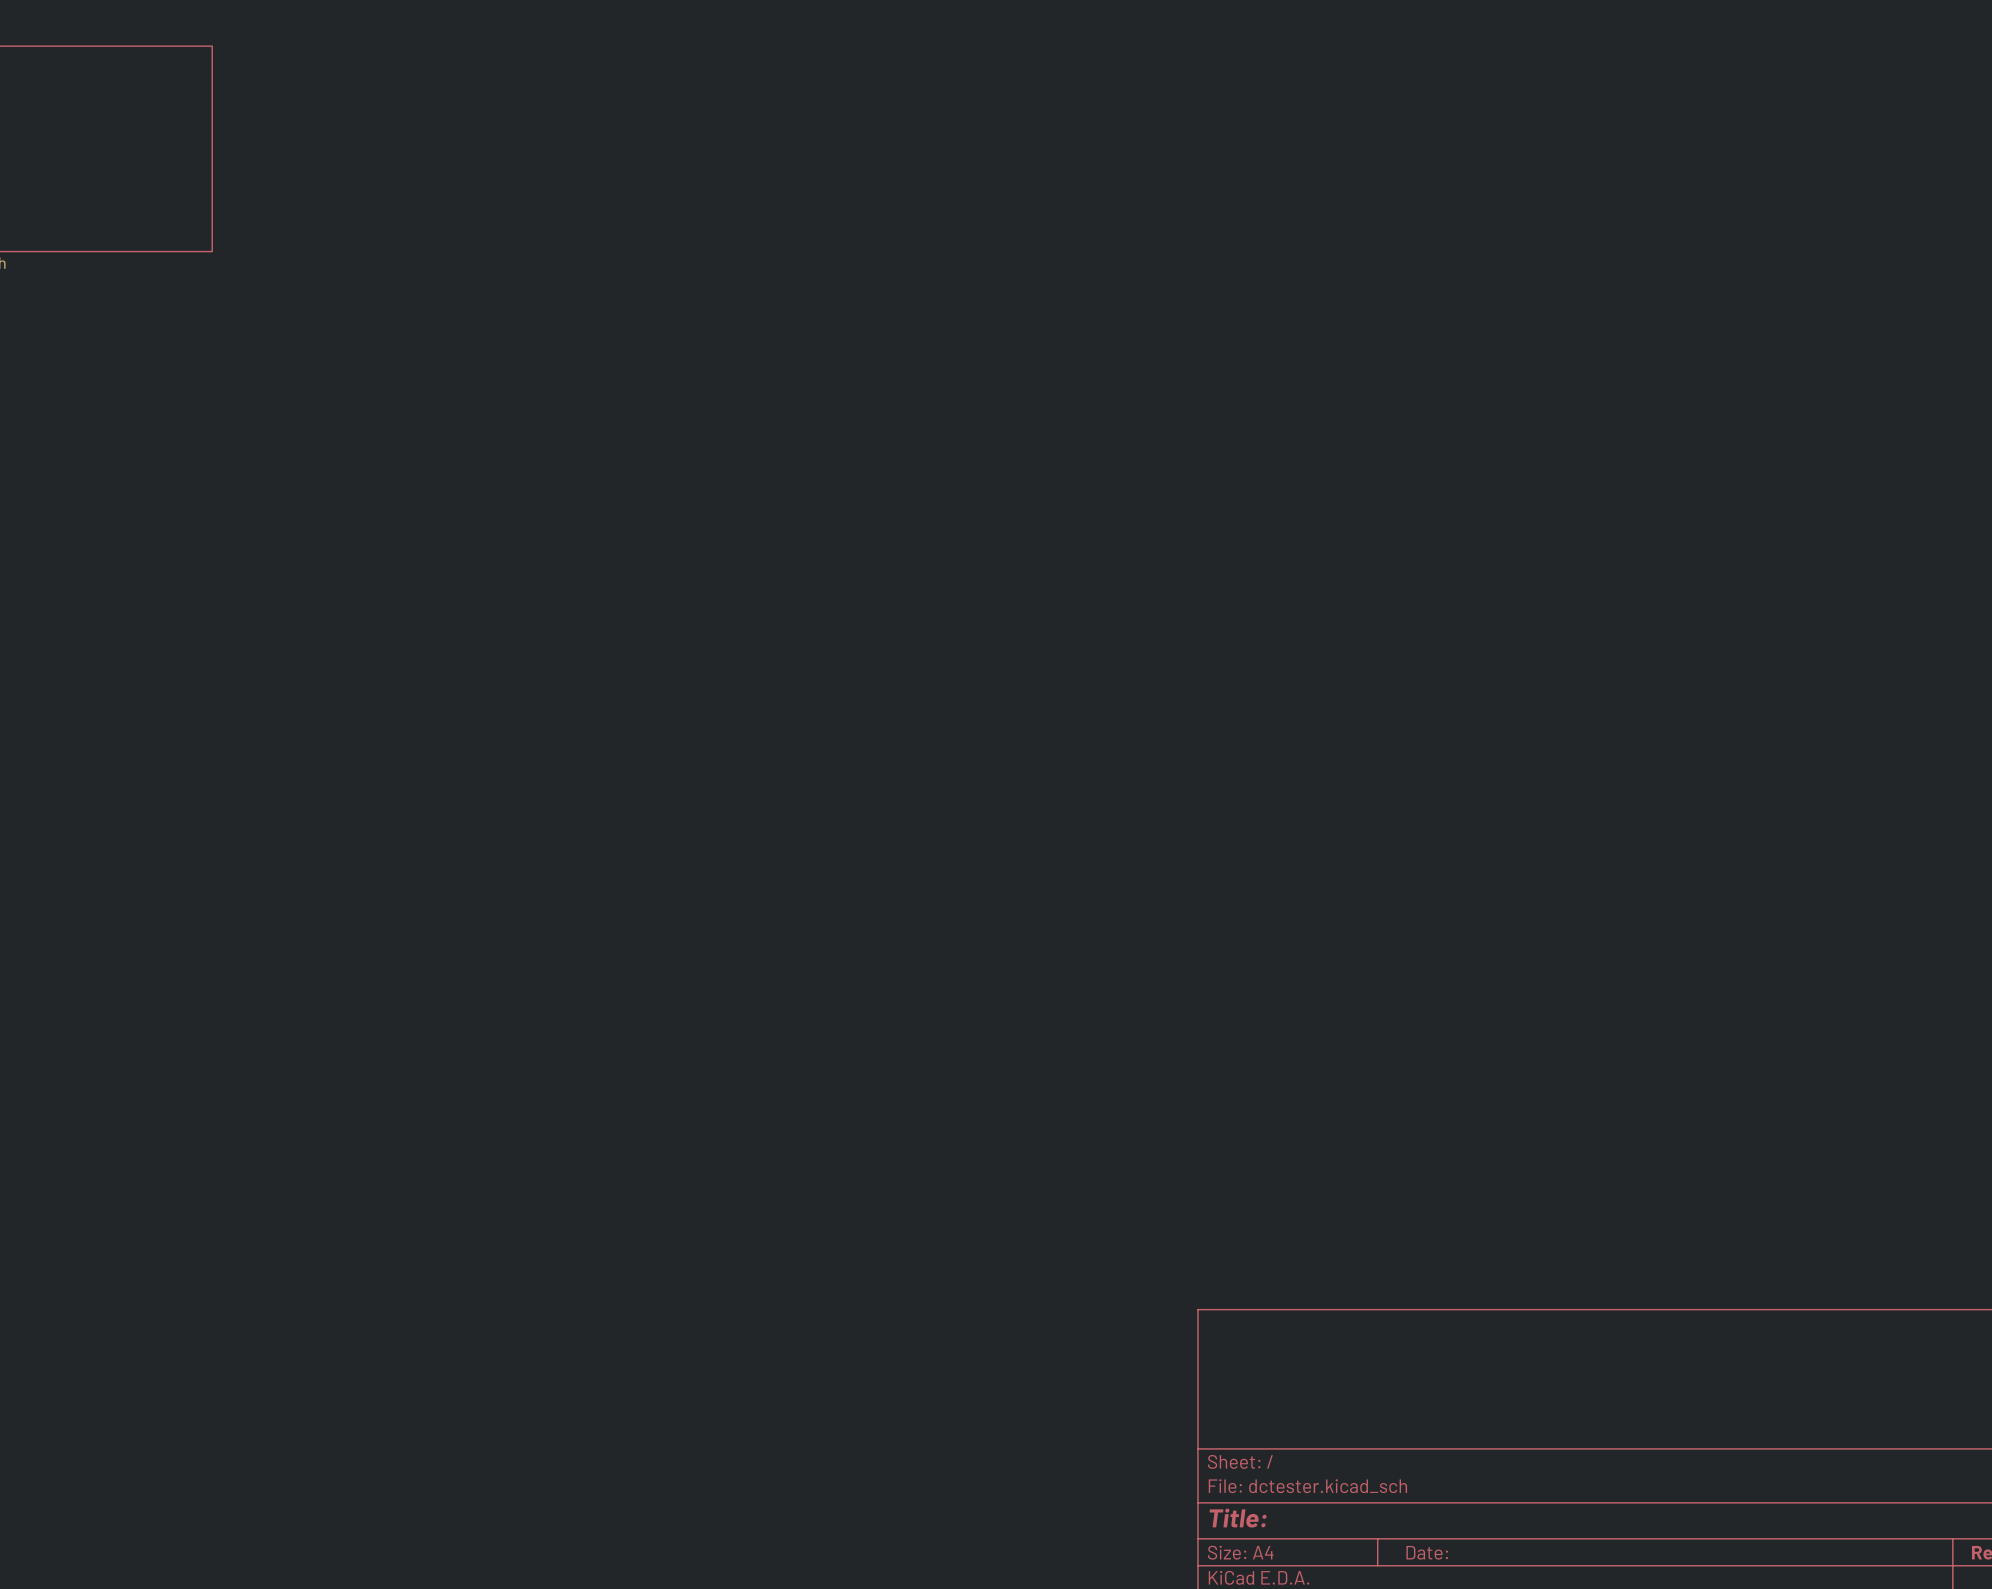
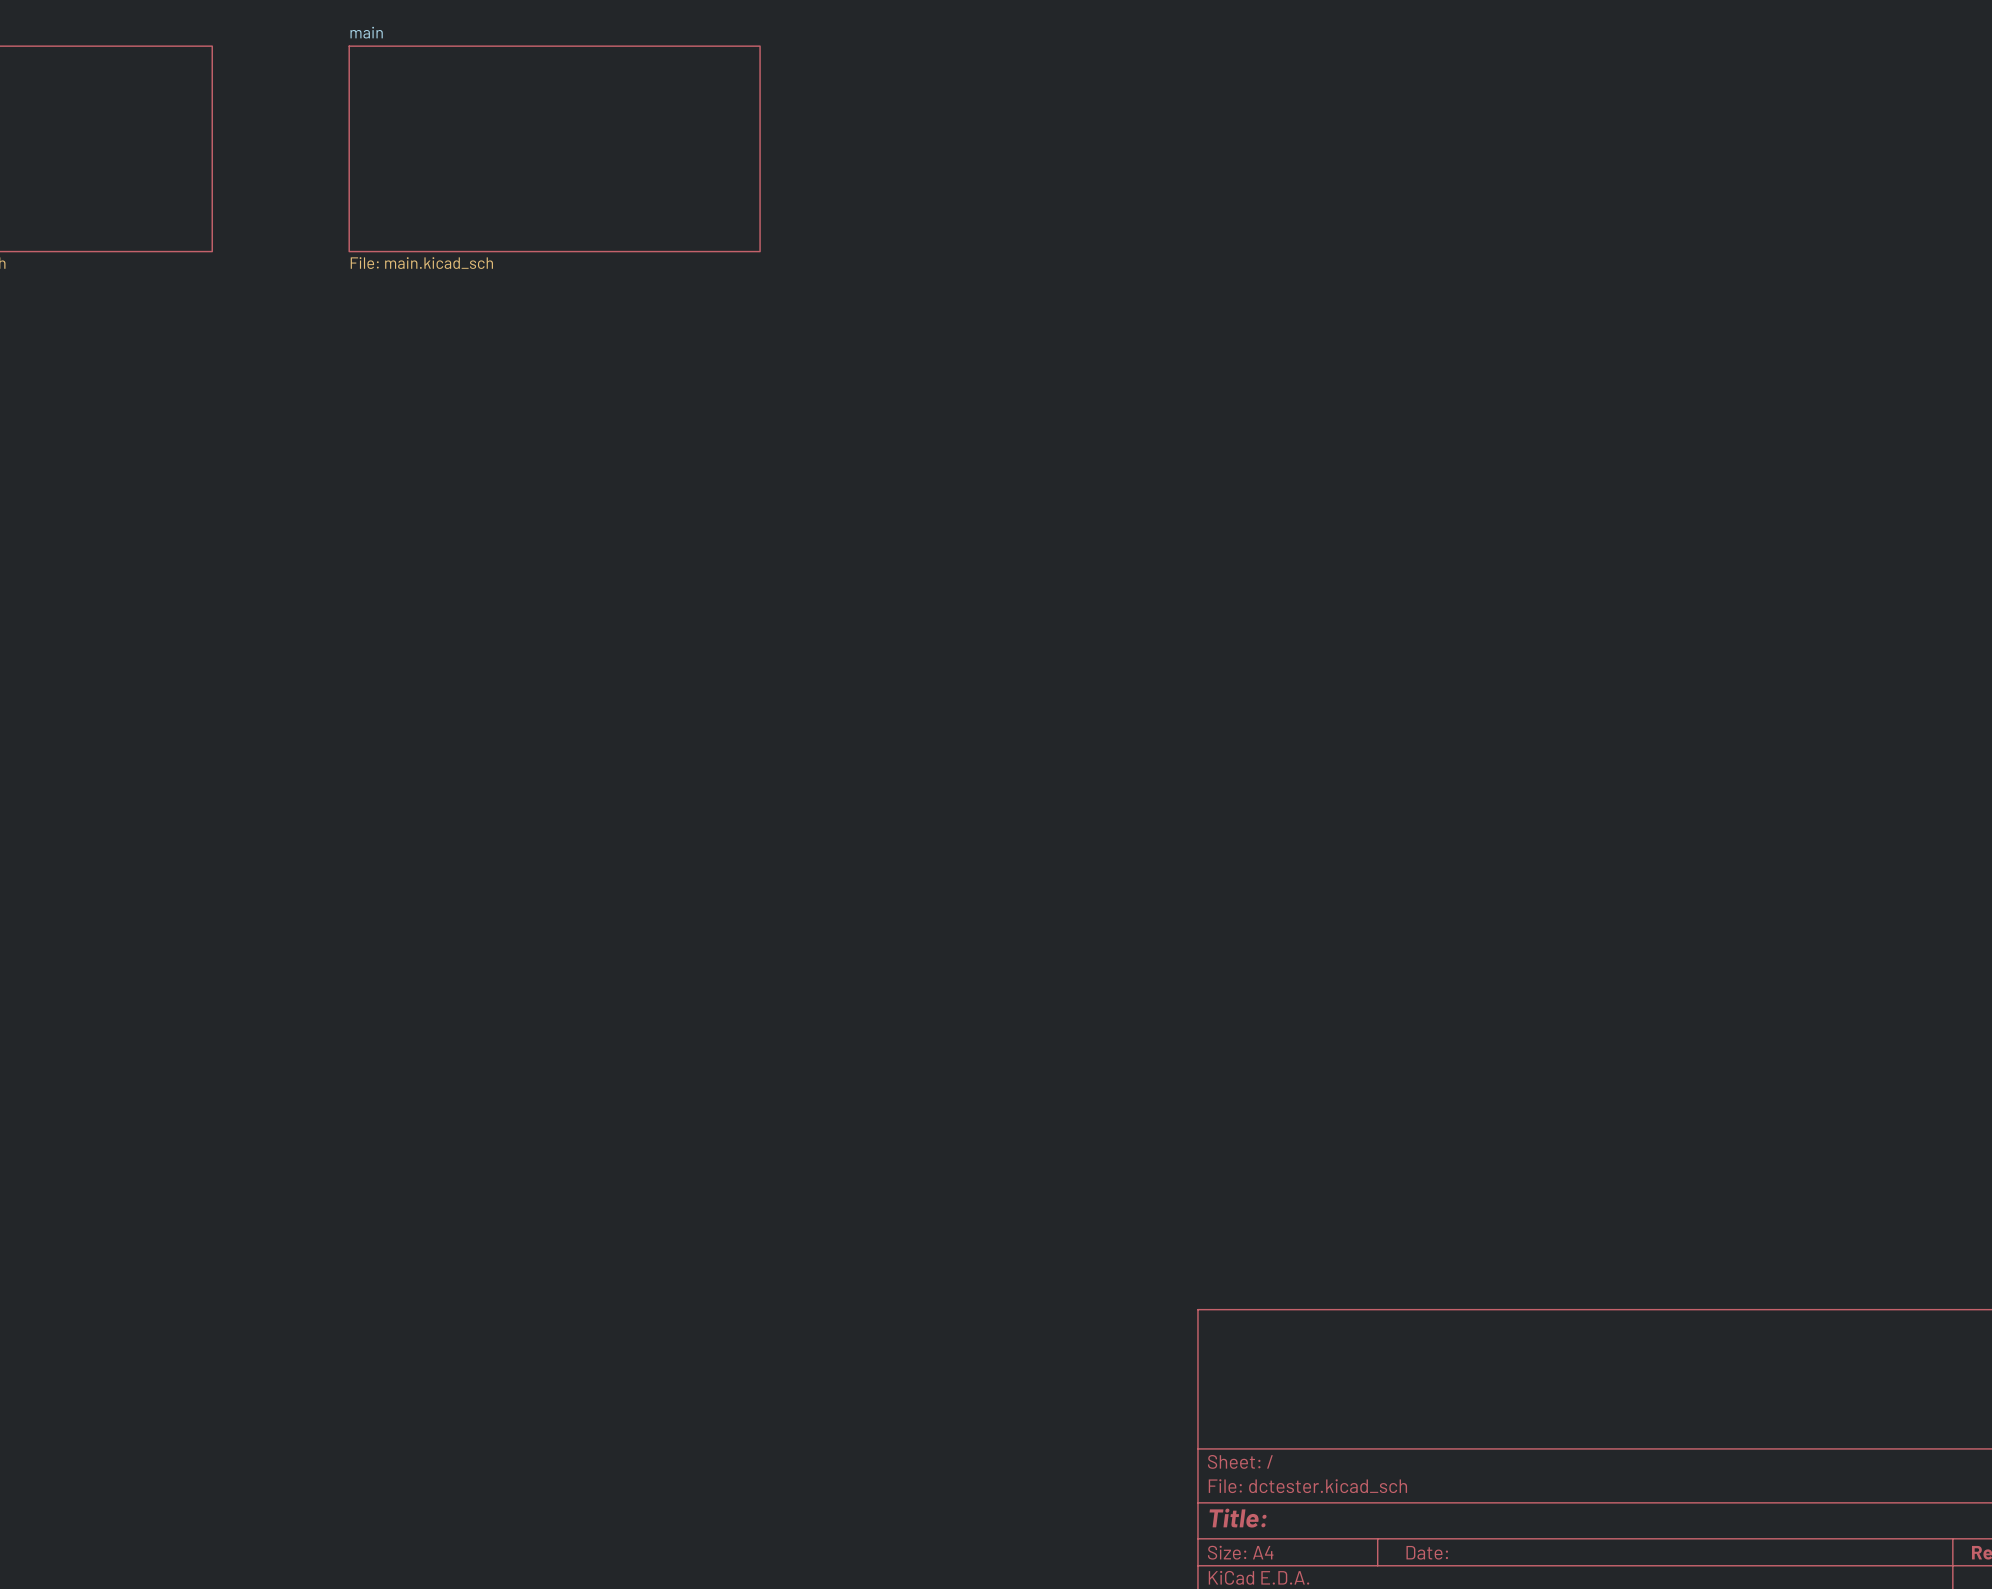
sheet main: none -> File: main.kicad_sch (554, 148)

